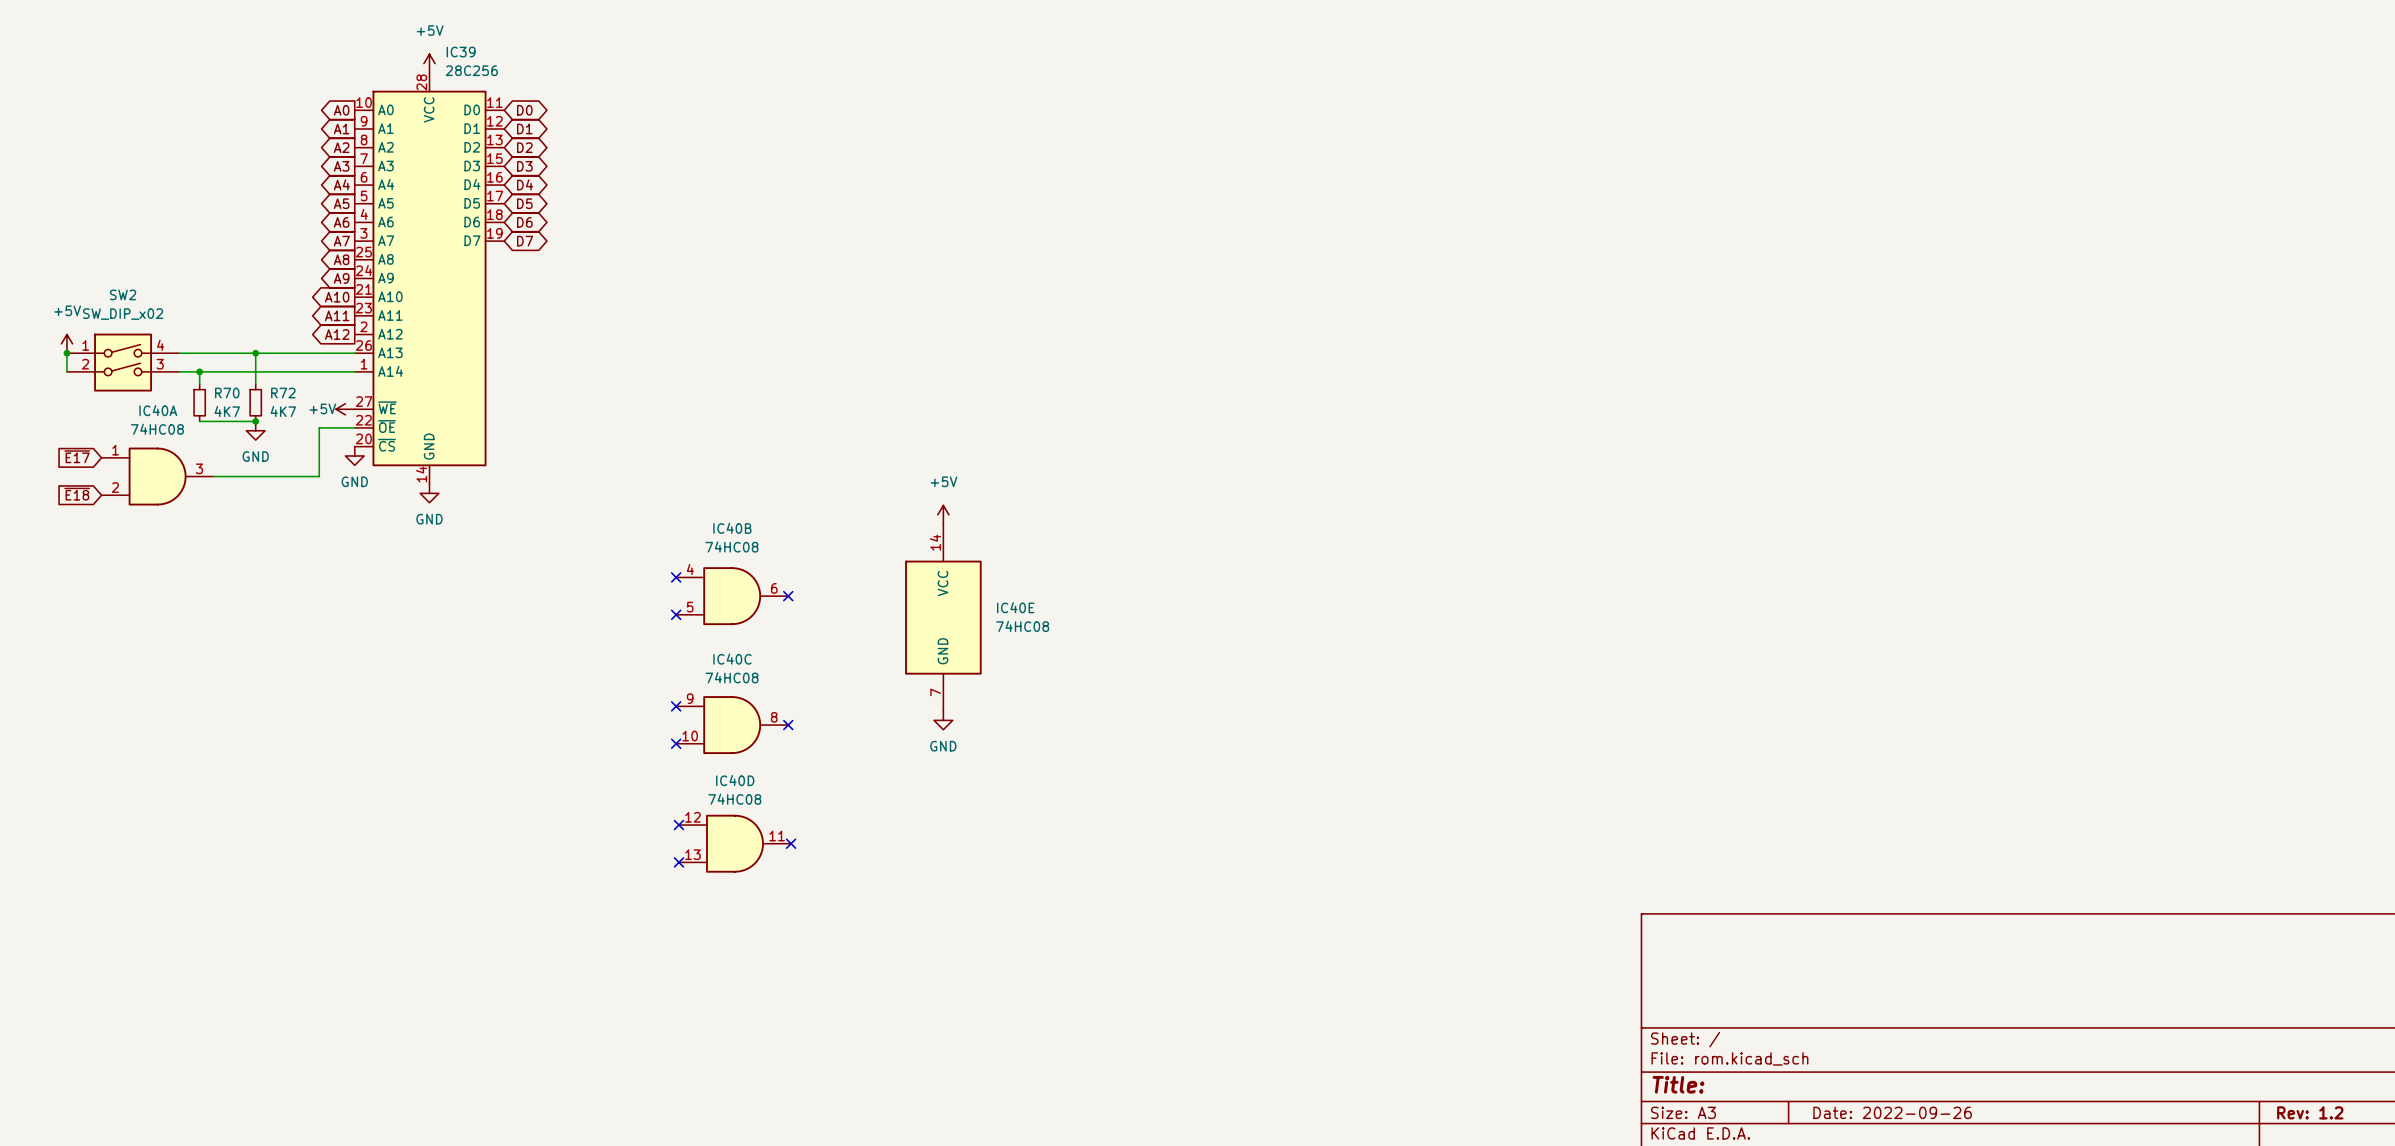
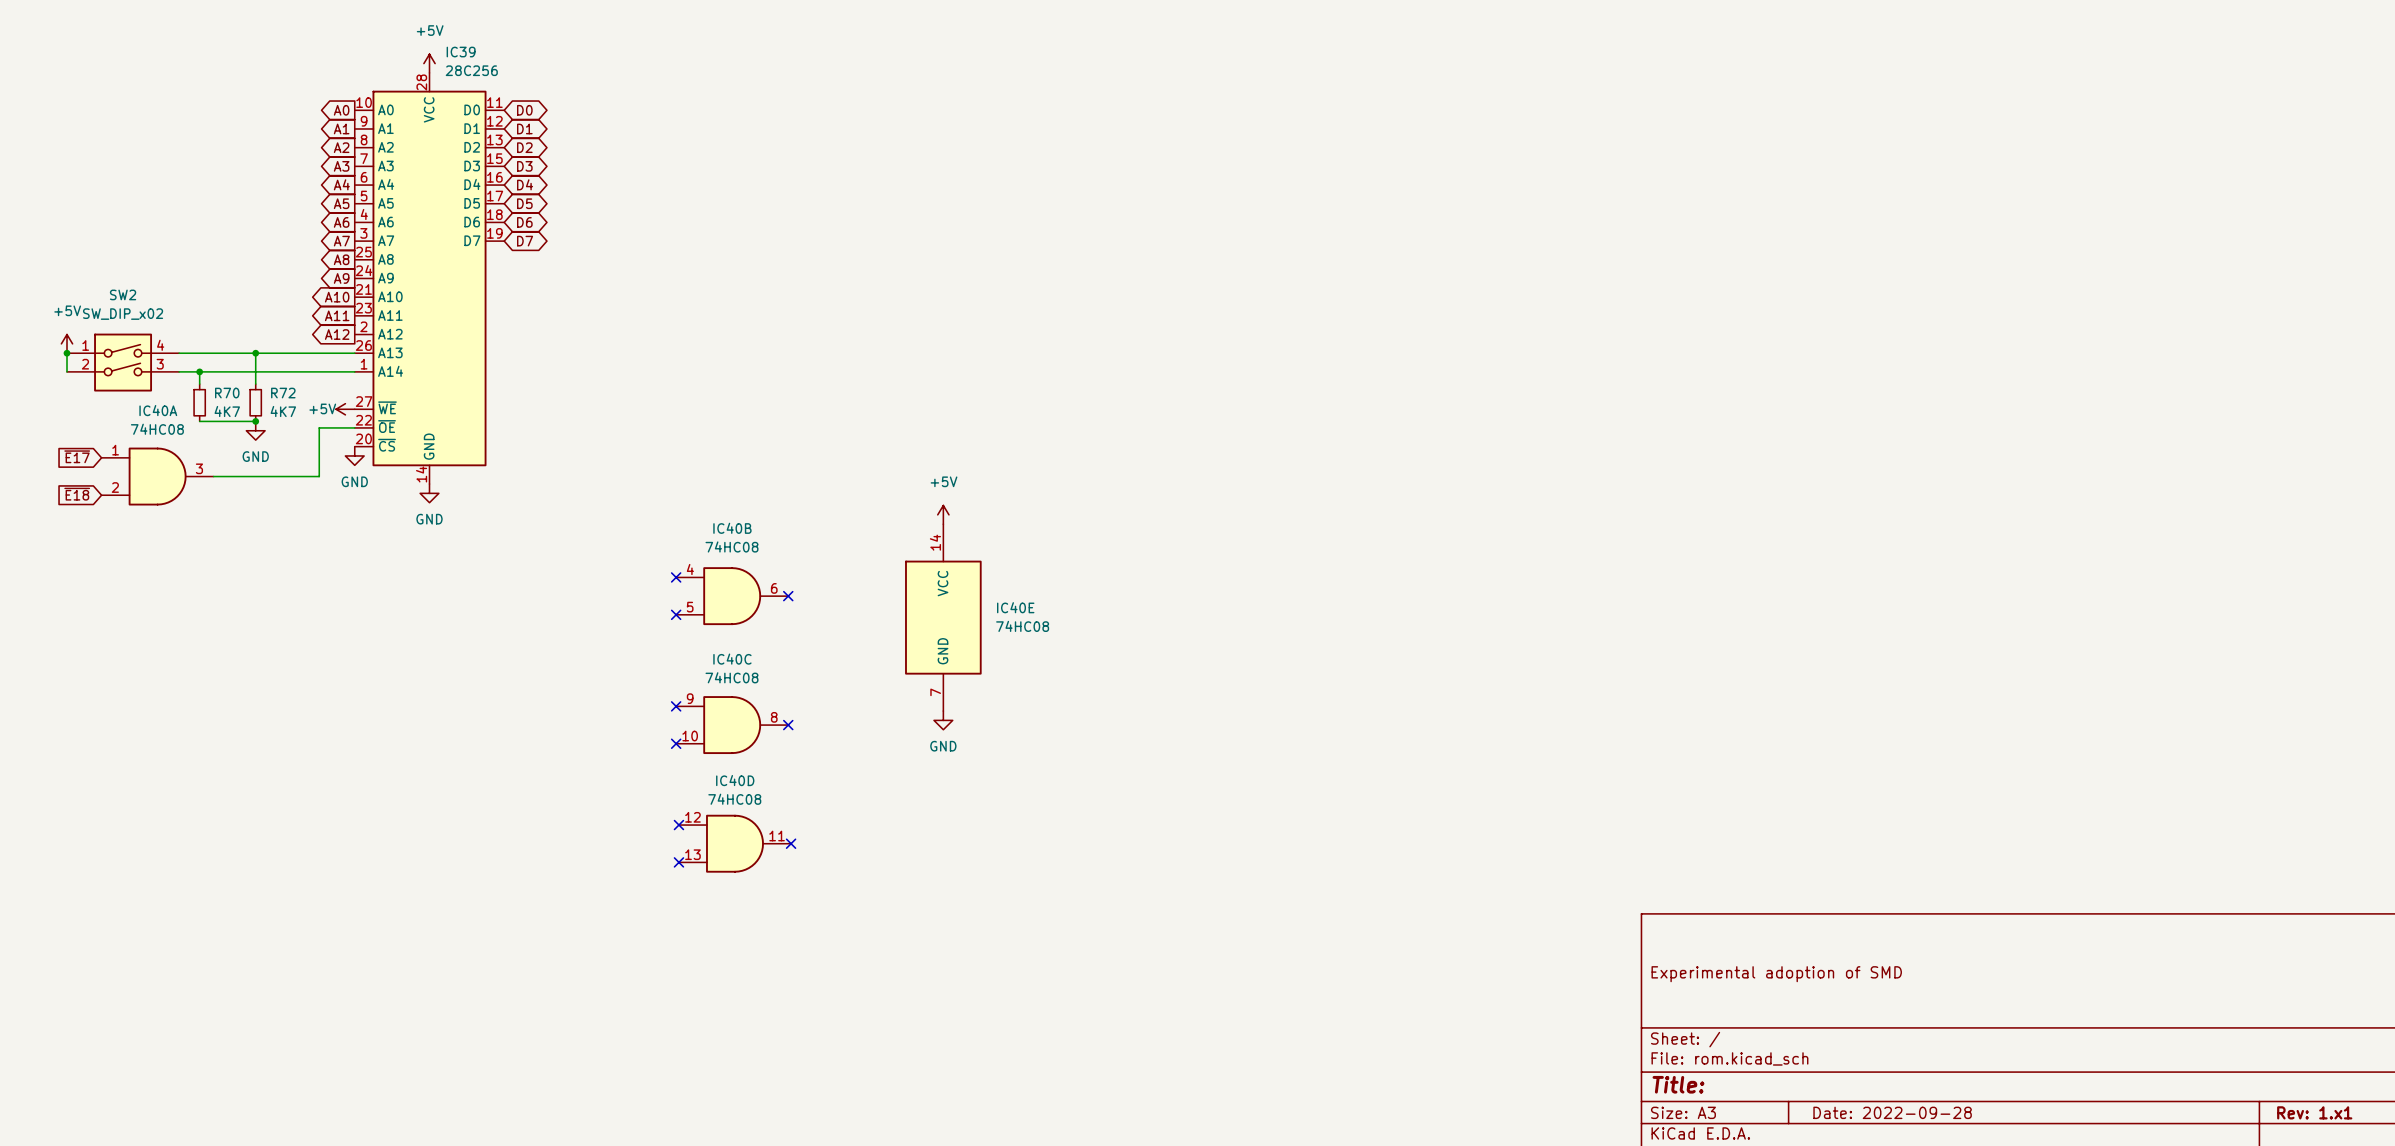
title block: none -> Experimental adoption of SMD (1776, 974)
title block: Date: 2022-09-26 (1892, 1112) -> Date: 2022-09-28 (1892, 1112)
title block: Rev: 1.2 (2310, 1112) -> Rev: 1.x1 (2314, 1112)

